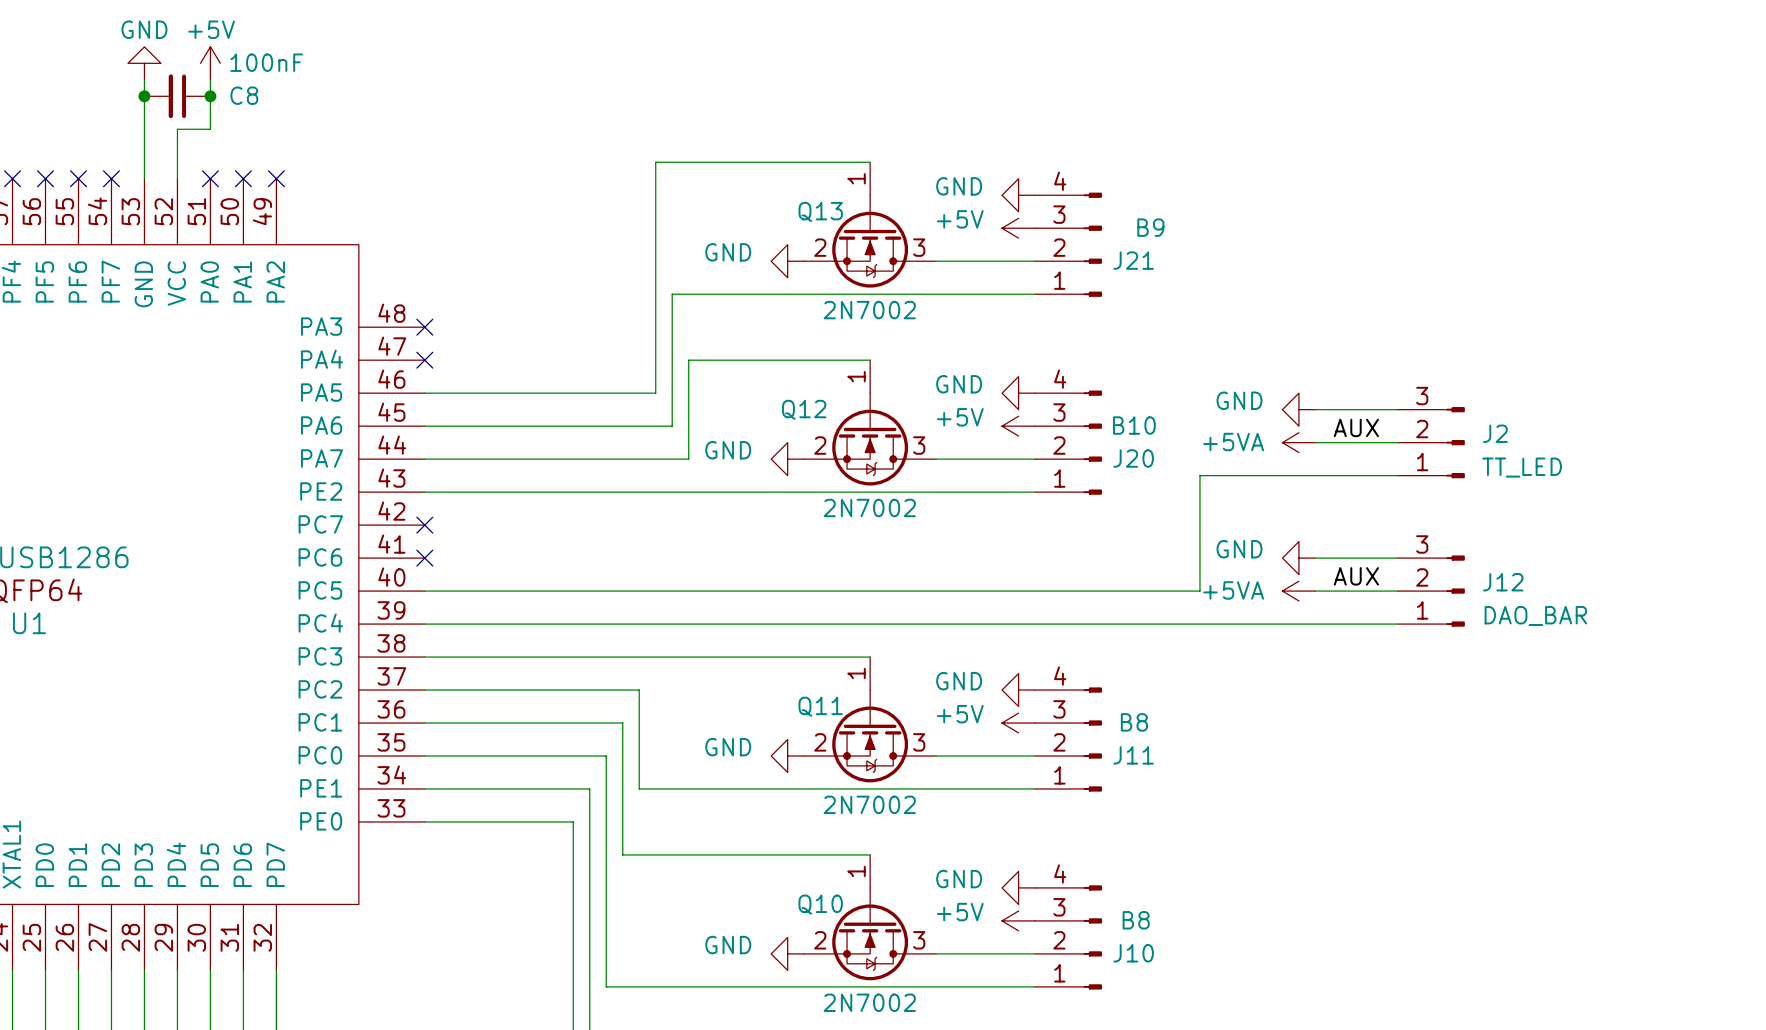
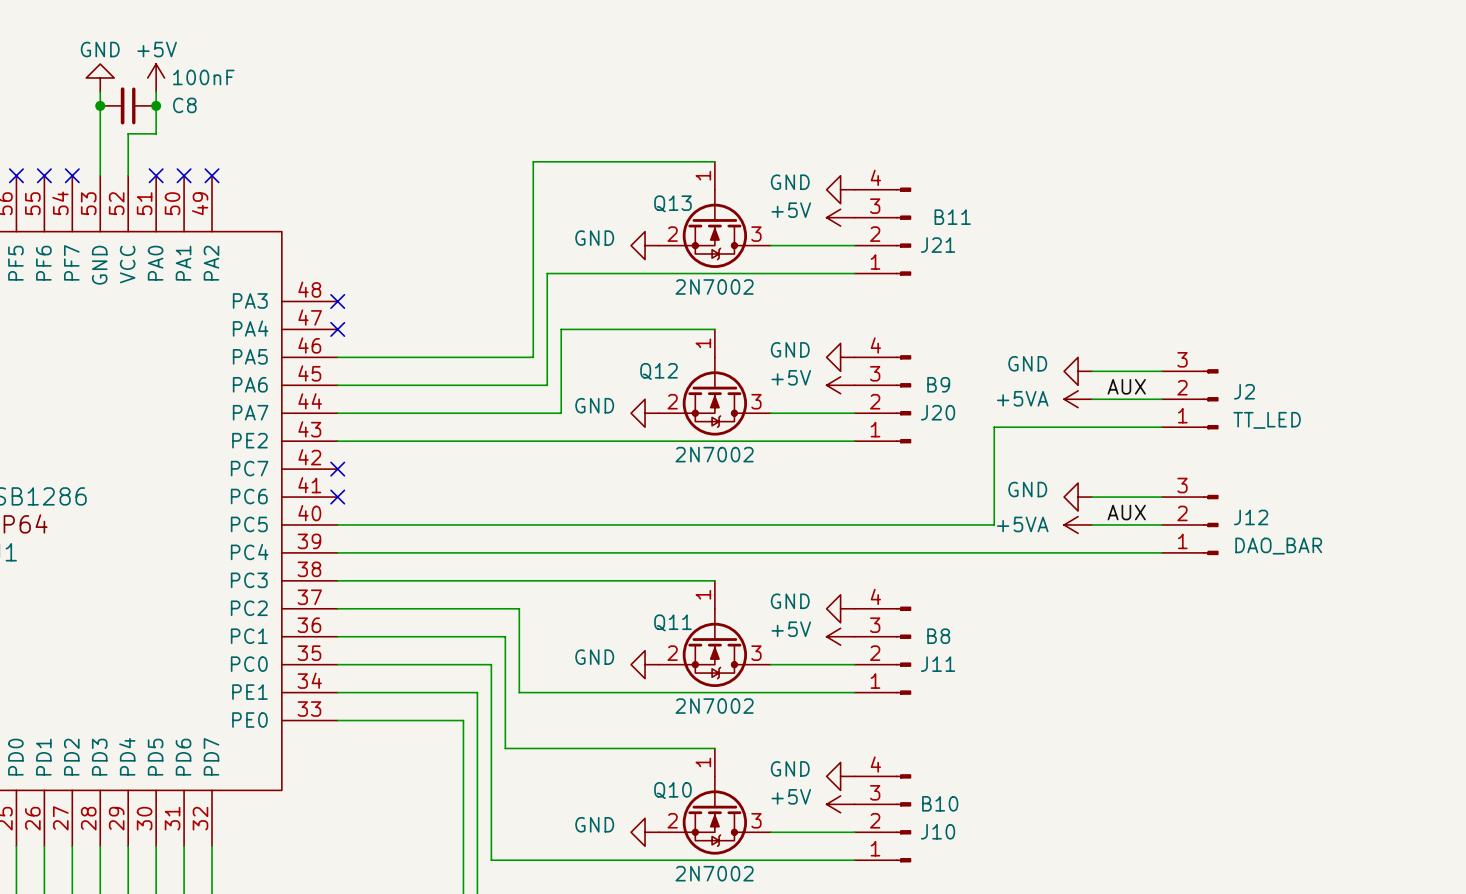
J21 value: B9 (1150, 227) -> B11 (952, 217)
J20 value: B10 (1134, 425) -> B9 (938, 384)
J10 value: B8 (1136, 920) -> B10 (940, 803)

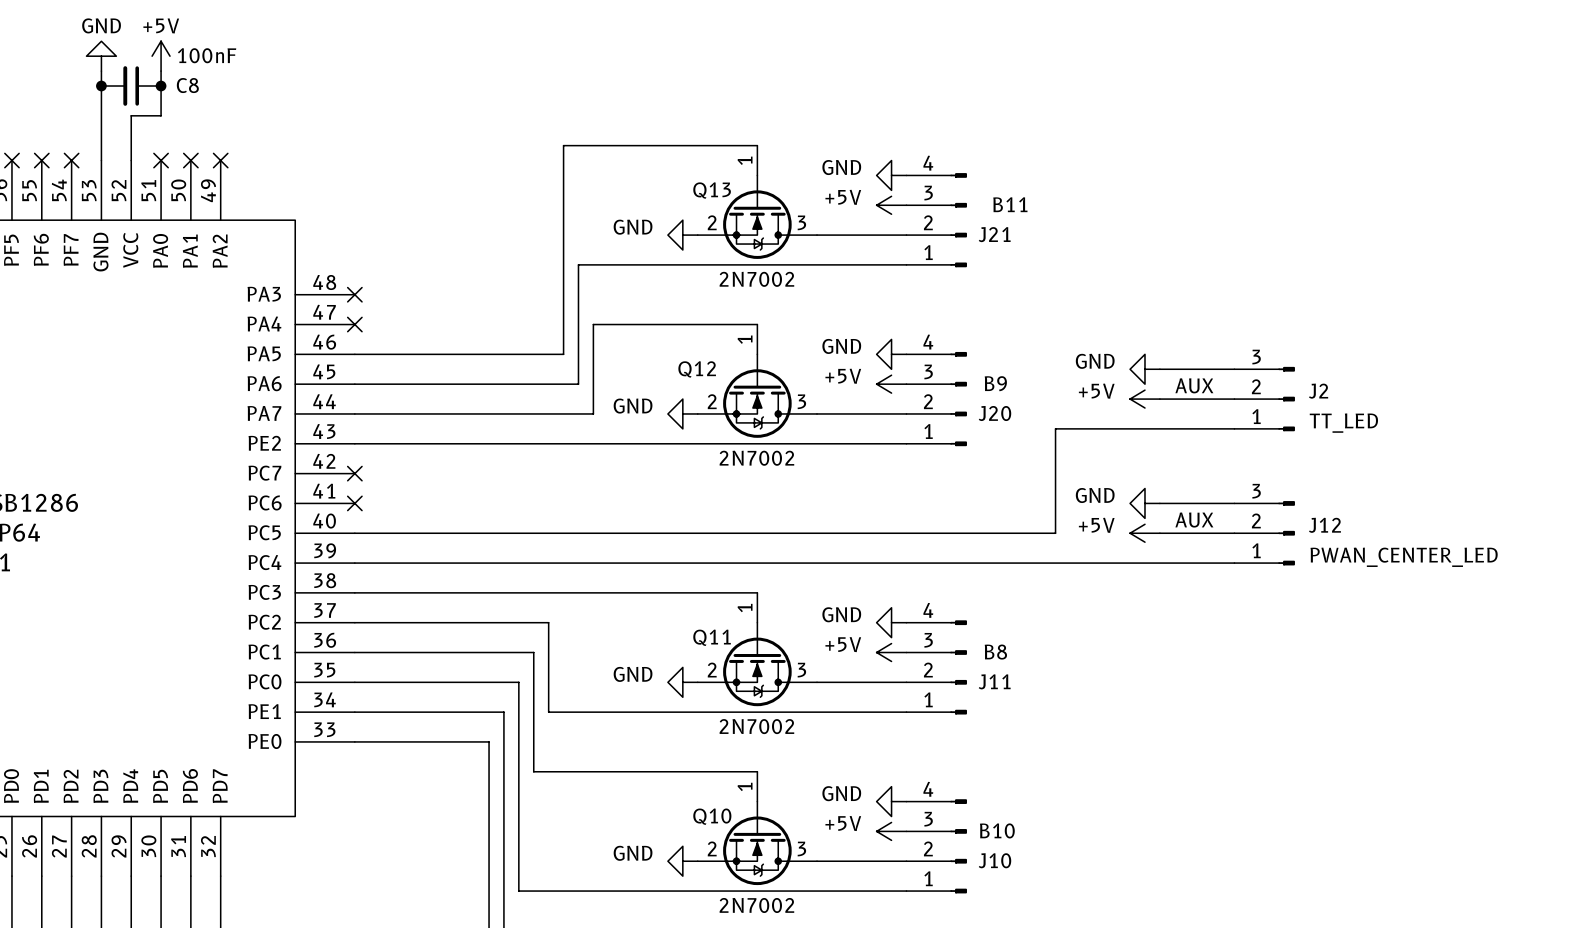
power symbol: +5VA (1078, 399) -> +5V (1144, 399)
power symbol: +5VA (1078, 524) -> +5V (1144, 533)
J12 value: DAO_BAR (1278, 546) -> PWAN_CENTER_LED (1404, 557)

